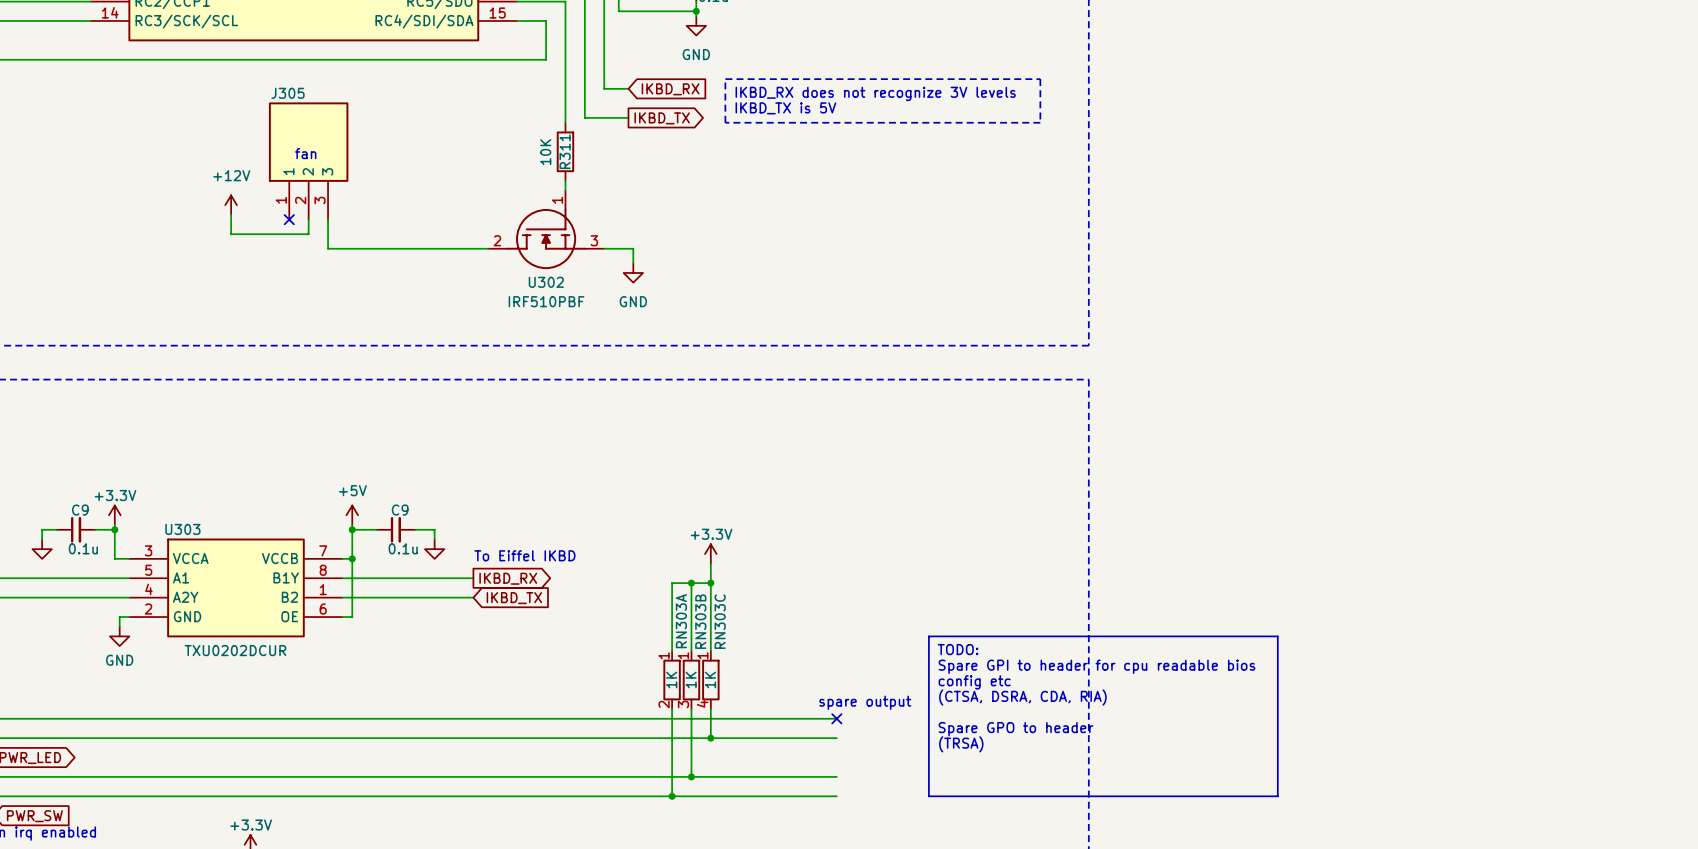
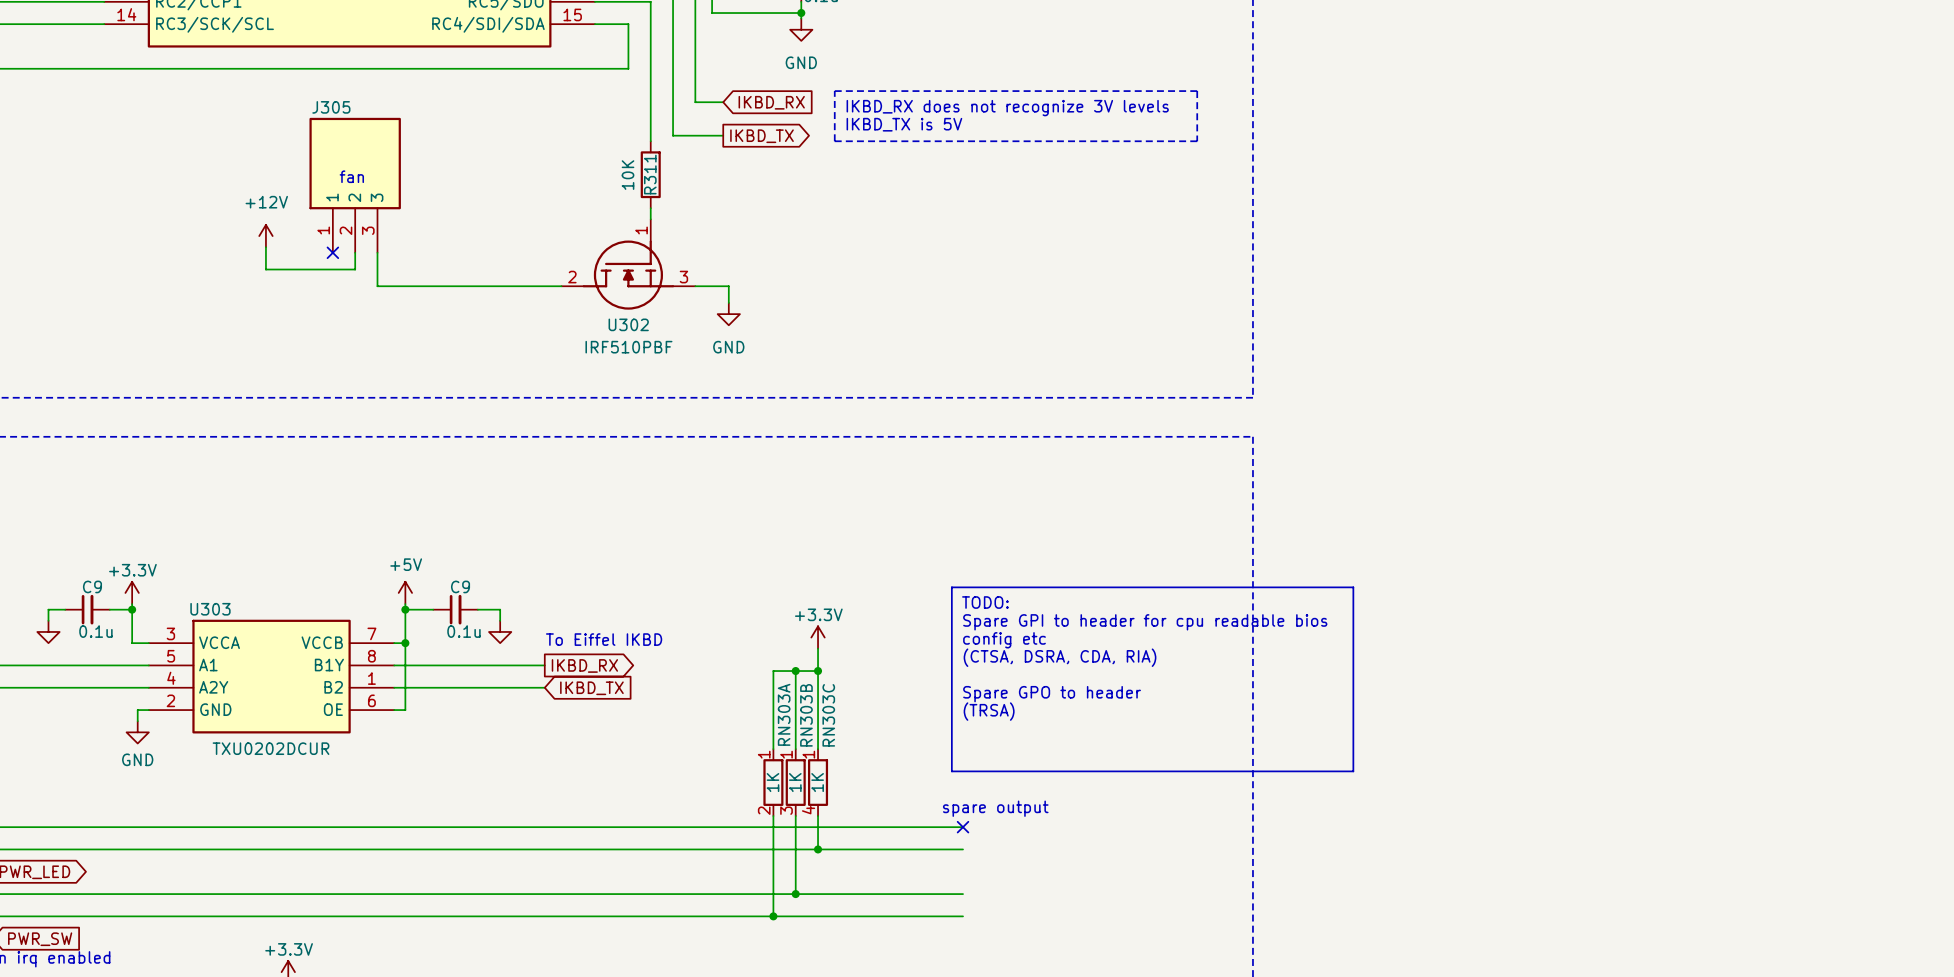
line: (928, 636) (1277, 636) (1277, 796) (928, 796) (928, 636) -> (951, 587) (1353, 587) (1353, 771) (951, 771) (951, 587)
text position: TODO: (958, 649) -> TODO: (985, 602)
text position: Spare GPI to header for cpu readable bios (1096, 666) -> Spare GPI to header for cpu readable bios (1145, 622)
text position: config etc (974, 682) -> config etc (1004, 640)
text position: (CTSA, DSRA, CDA, RIA) (1022, 697) -> (CTSA, DSRA, CDA, RIA) (1060, 657)
text position: Spare GPO to header (1015, 729) -> Spare GPO to header (1052, 694)
text position: (TRSA) (961, 744) -> (TRSA) (989, 711)

